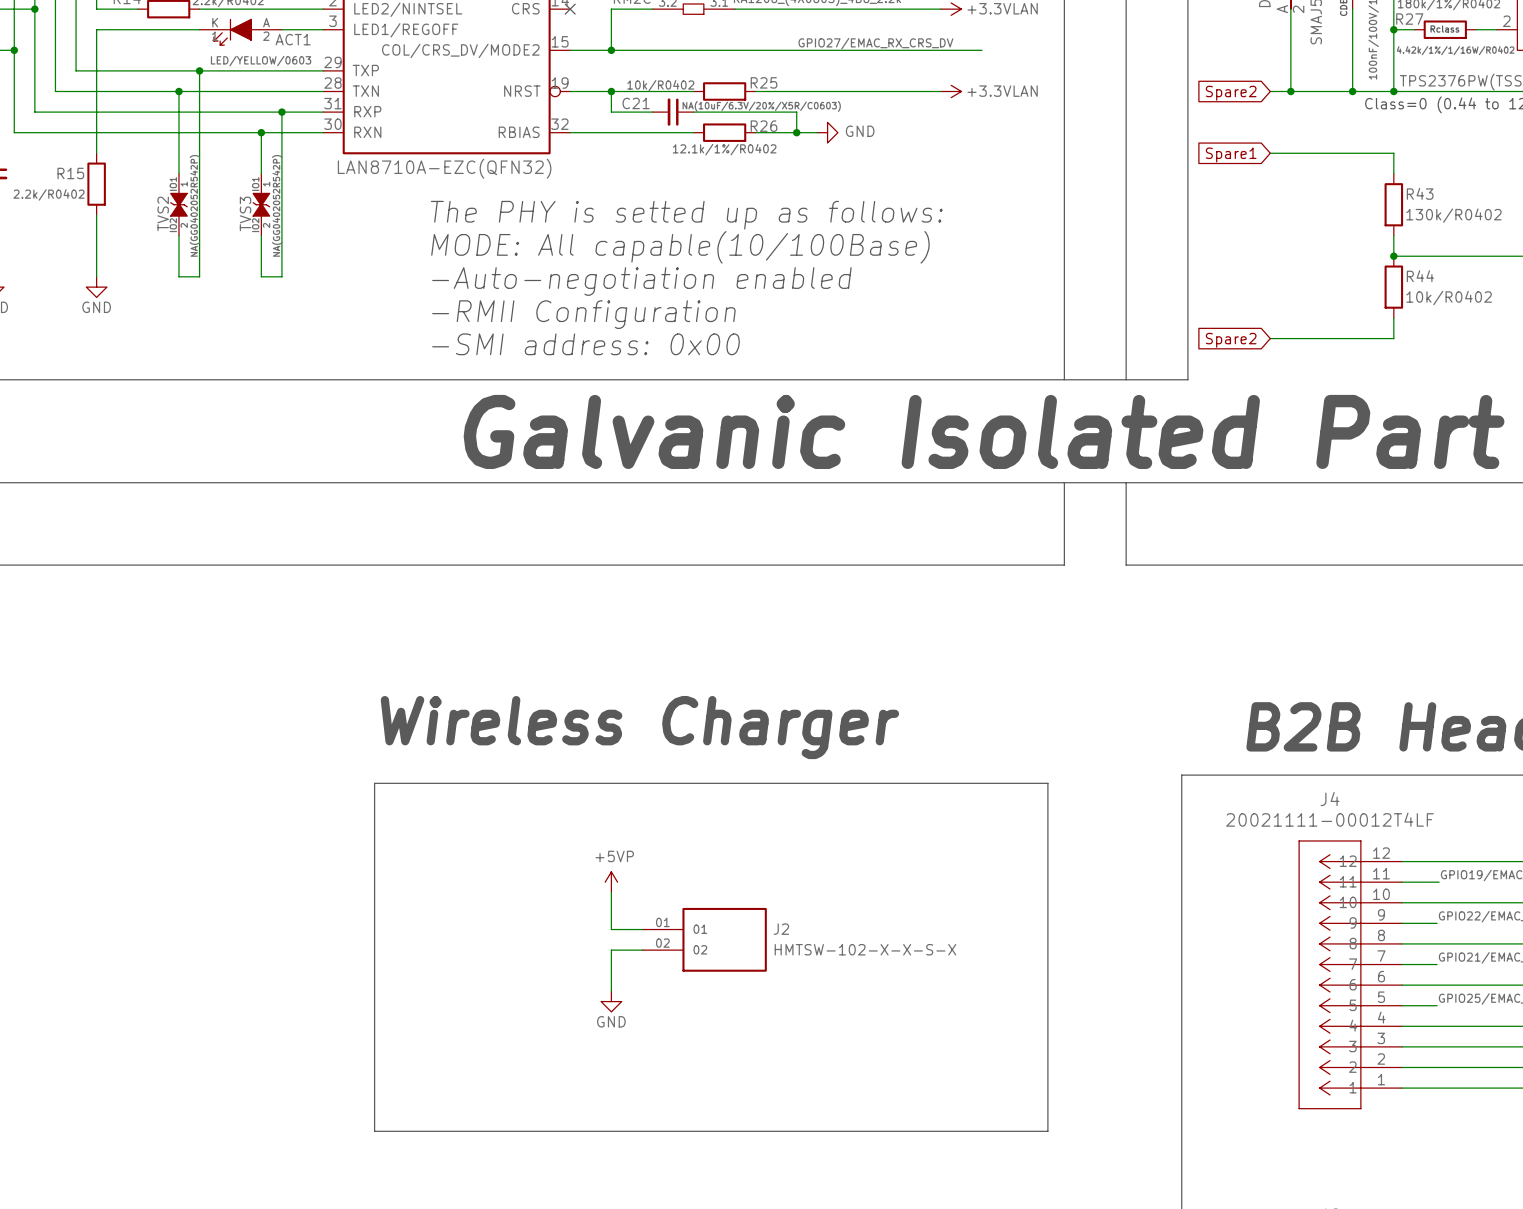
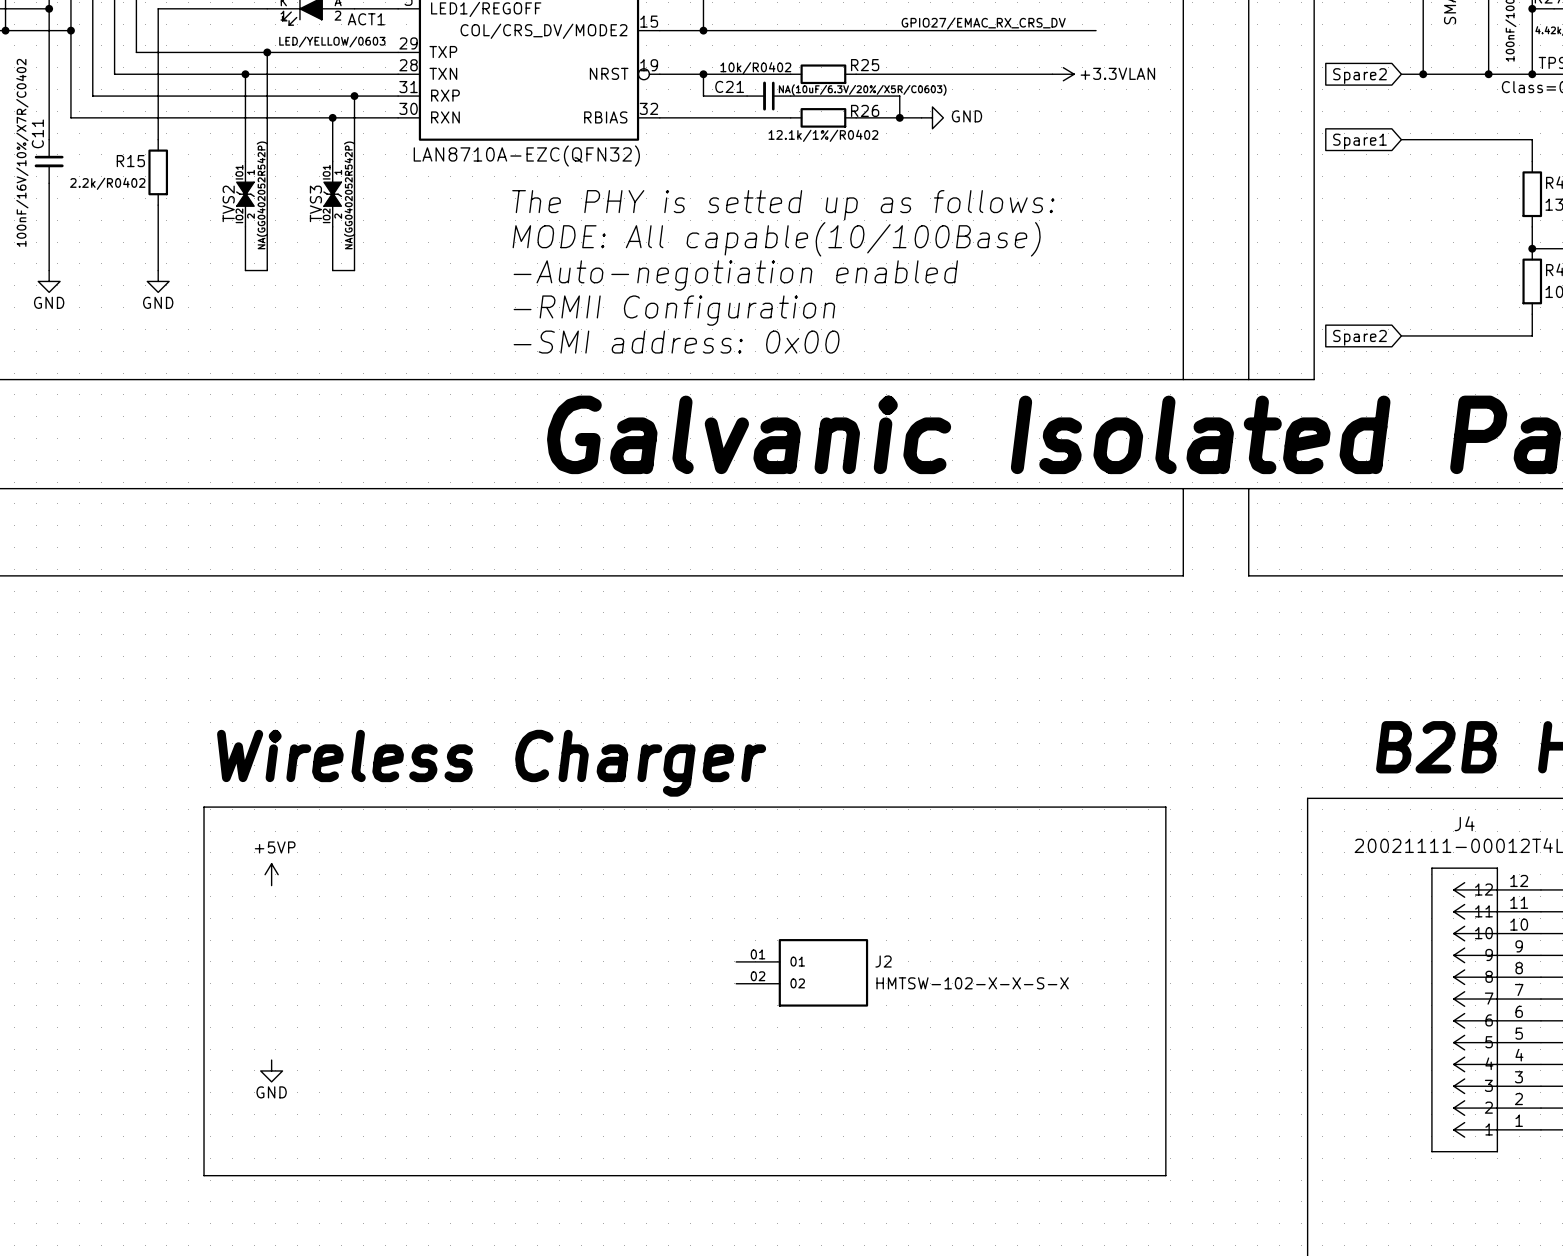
text: Wireless Charger (639, 727) -> none
text: none -> Wireless Charger (491, 763)
line: (374, 783) (374, 1131) -> (452, 807) (204, 807) (204, 1175) (452, 1175)
power symbol: none -> +5VP (271, 874)
power symbol: +5VP (611, 882) -> none
wire: (611, 892) (611, 929) (642, 929) -> none
wire: (642, 950) (611, 950) (611, 991) -> none
power symbol: GND (611, 1001) -> none
power symbol: none -> GND (271, 1070)

